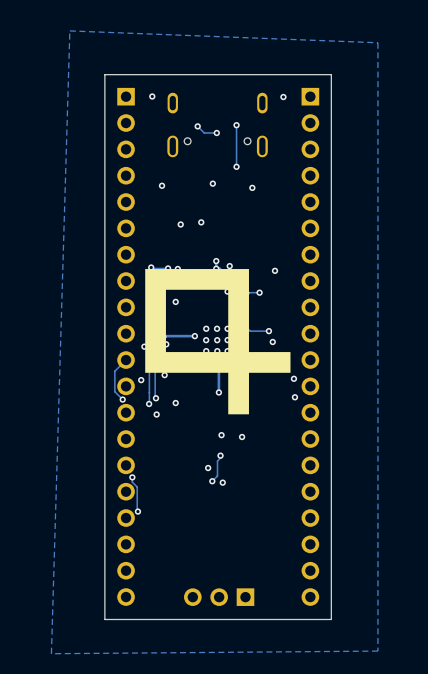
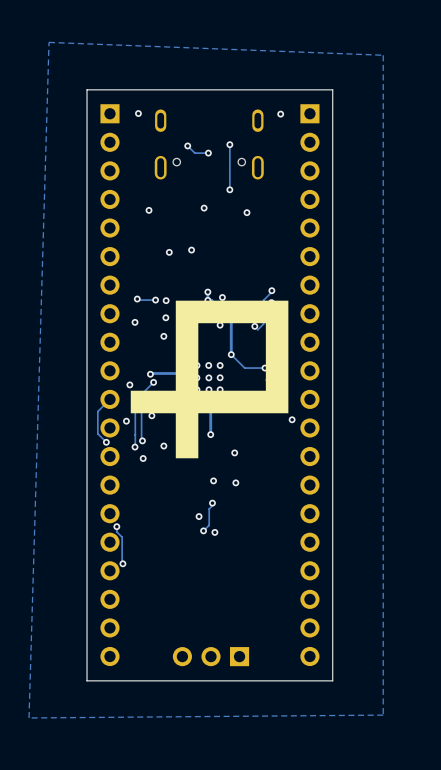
track: none -> (271, 290) (263, 300) (263, 324) (257, 330)
via: none -> (271, 290)
drawing shape: [145, 269, 291, 415] -> [130, 300, 289, 459]
track: (259, 292) (246, 293) -> none
via: (294, 397) -> none

